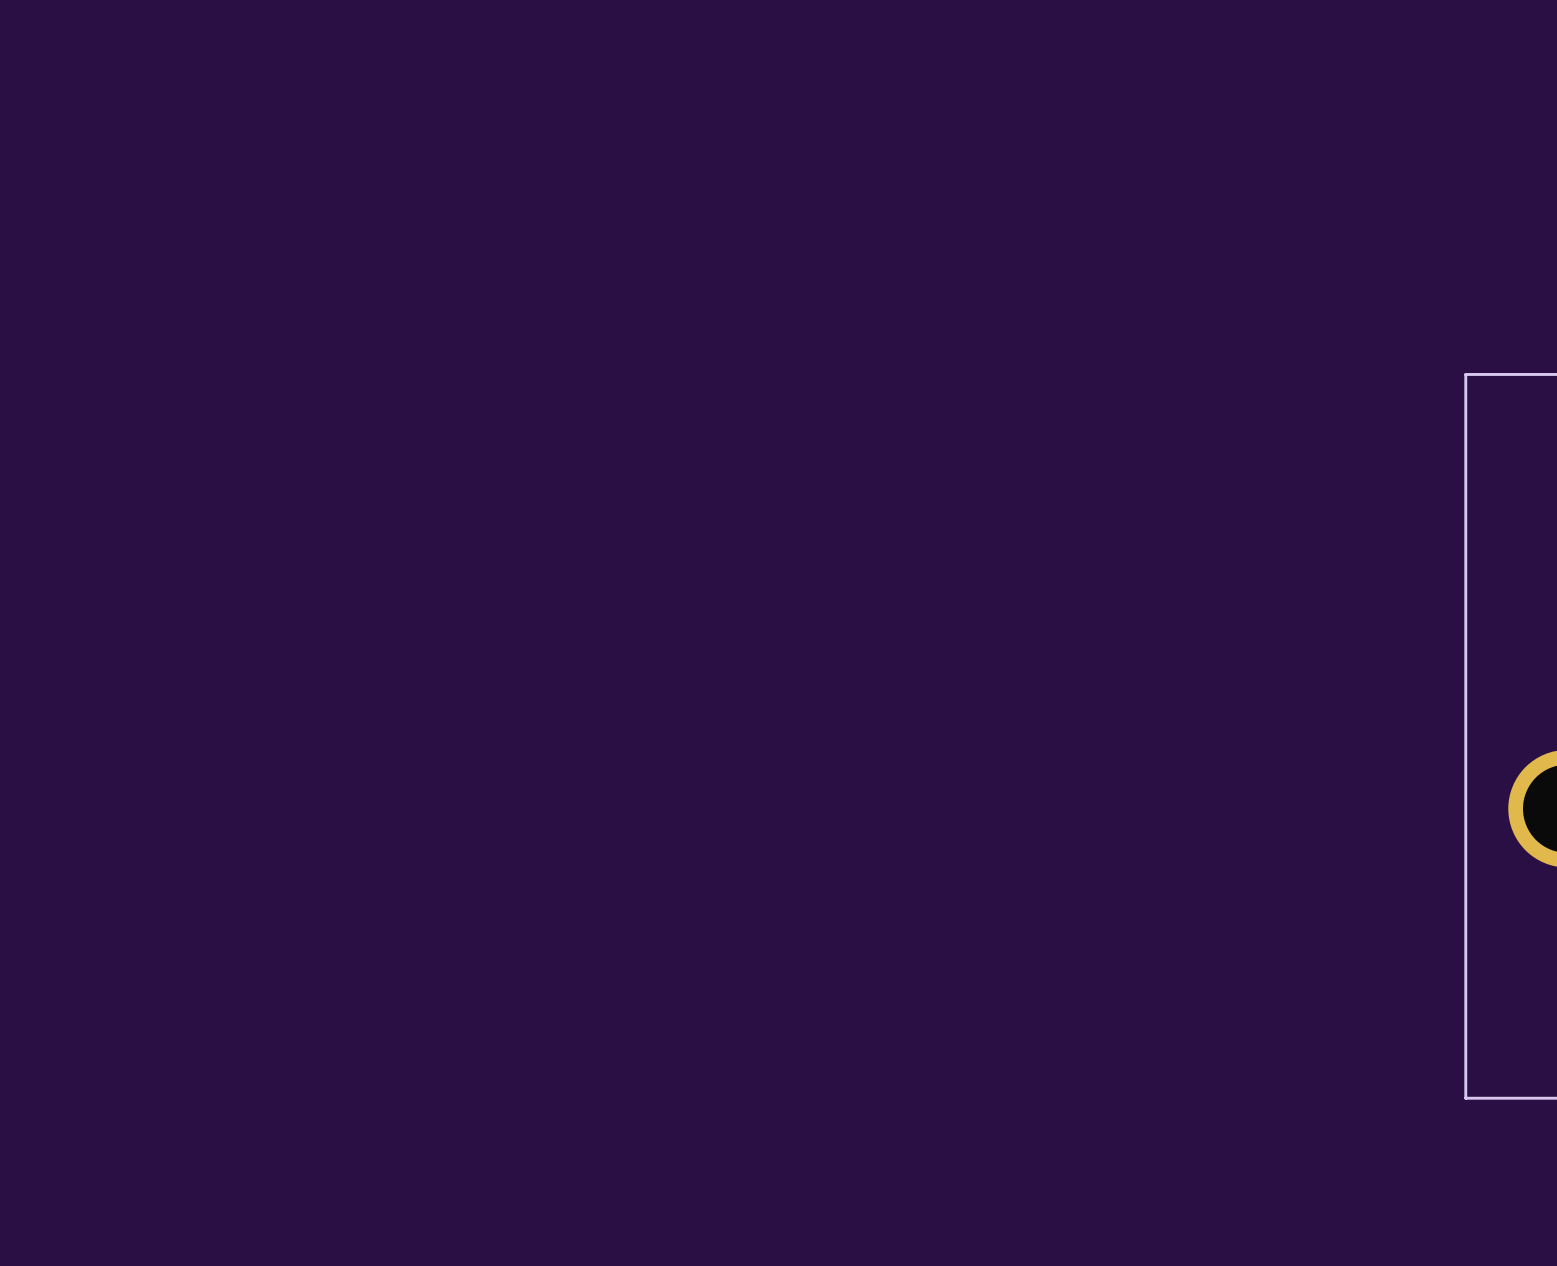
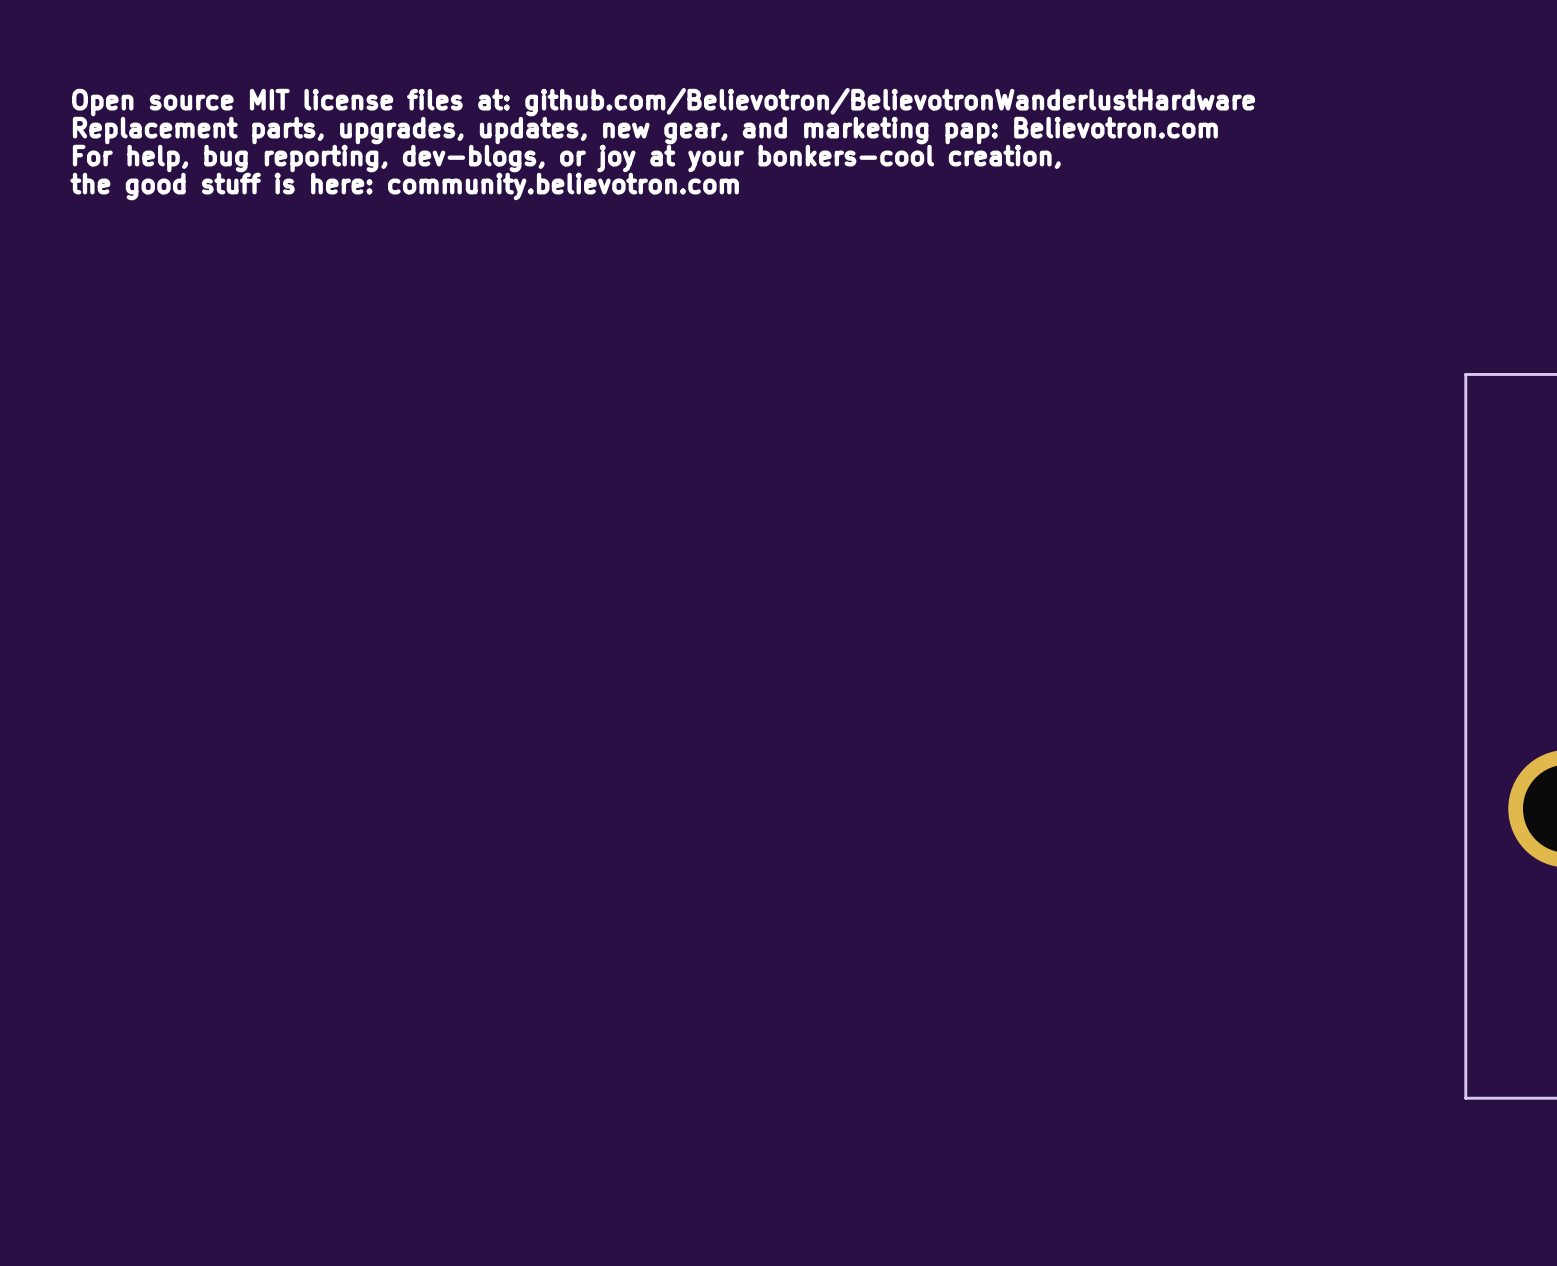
text: none -> Open source MIT license files at: github.com/Believotron/BelievotronWanderlustHardware (663, 102)
text: none -> Replacement parts, upgrades, updates, new gear, and marketing pap: Believotron.com (645, 130)
text: none -> For help, bug reporting, dev-blogs, or joy at your bonkers-cool creation, (566, 158)
text: none -> the good stuff is here: community.believotron.com (404, 186)

